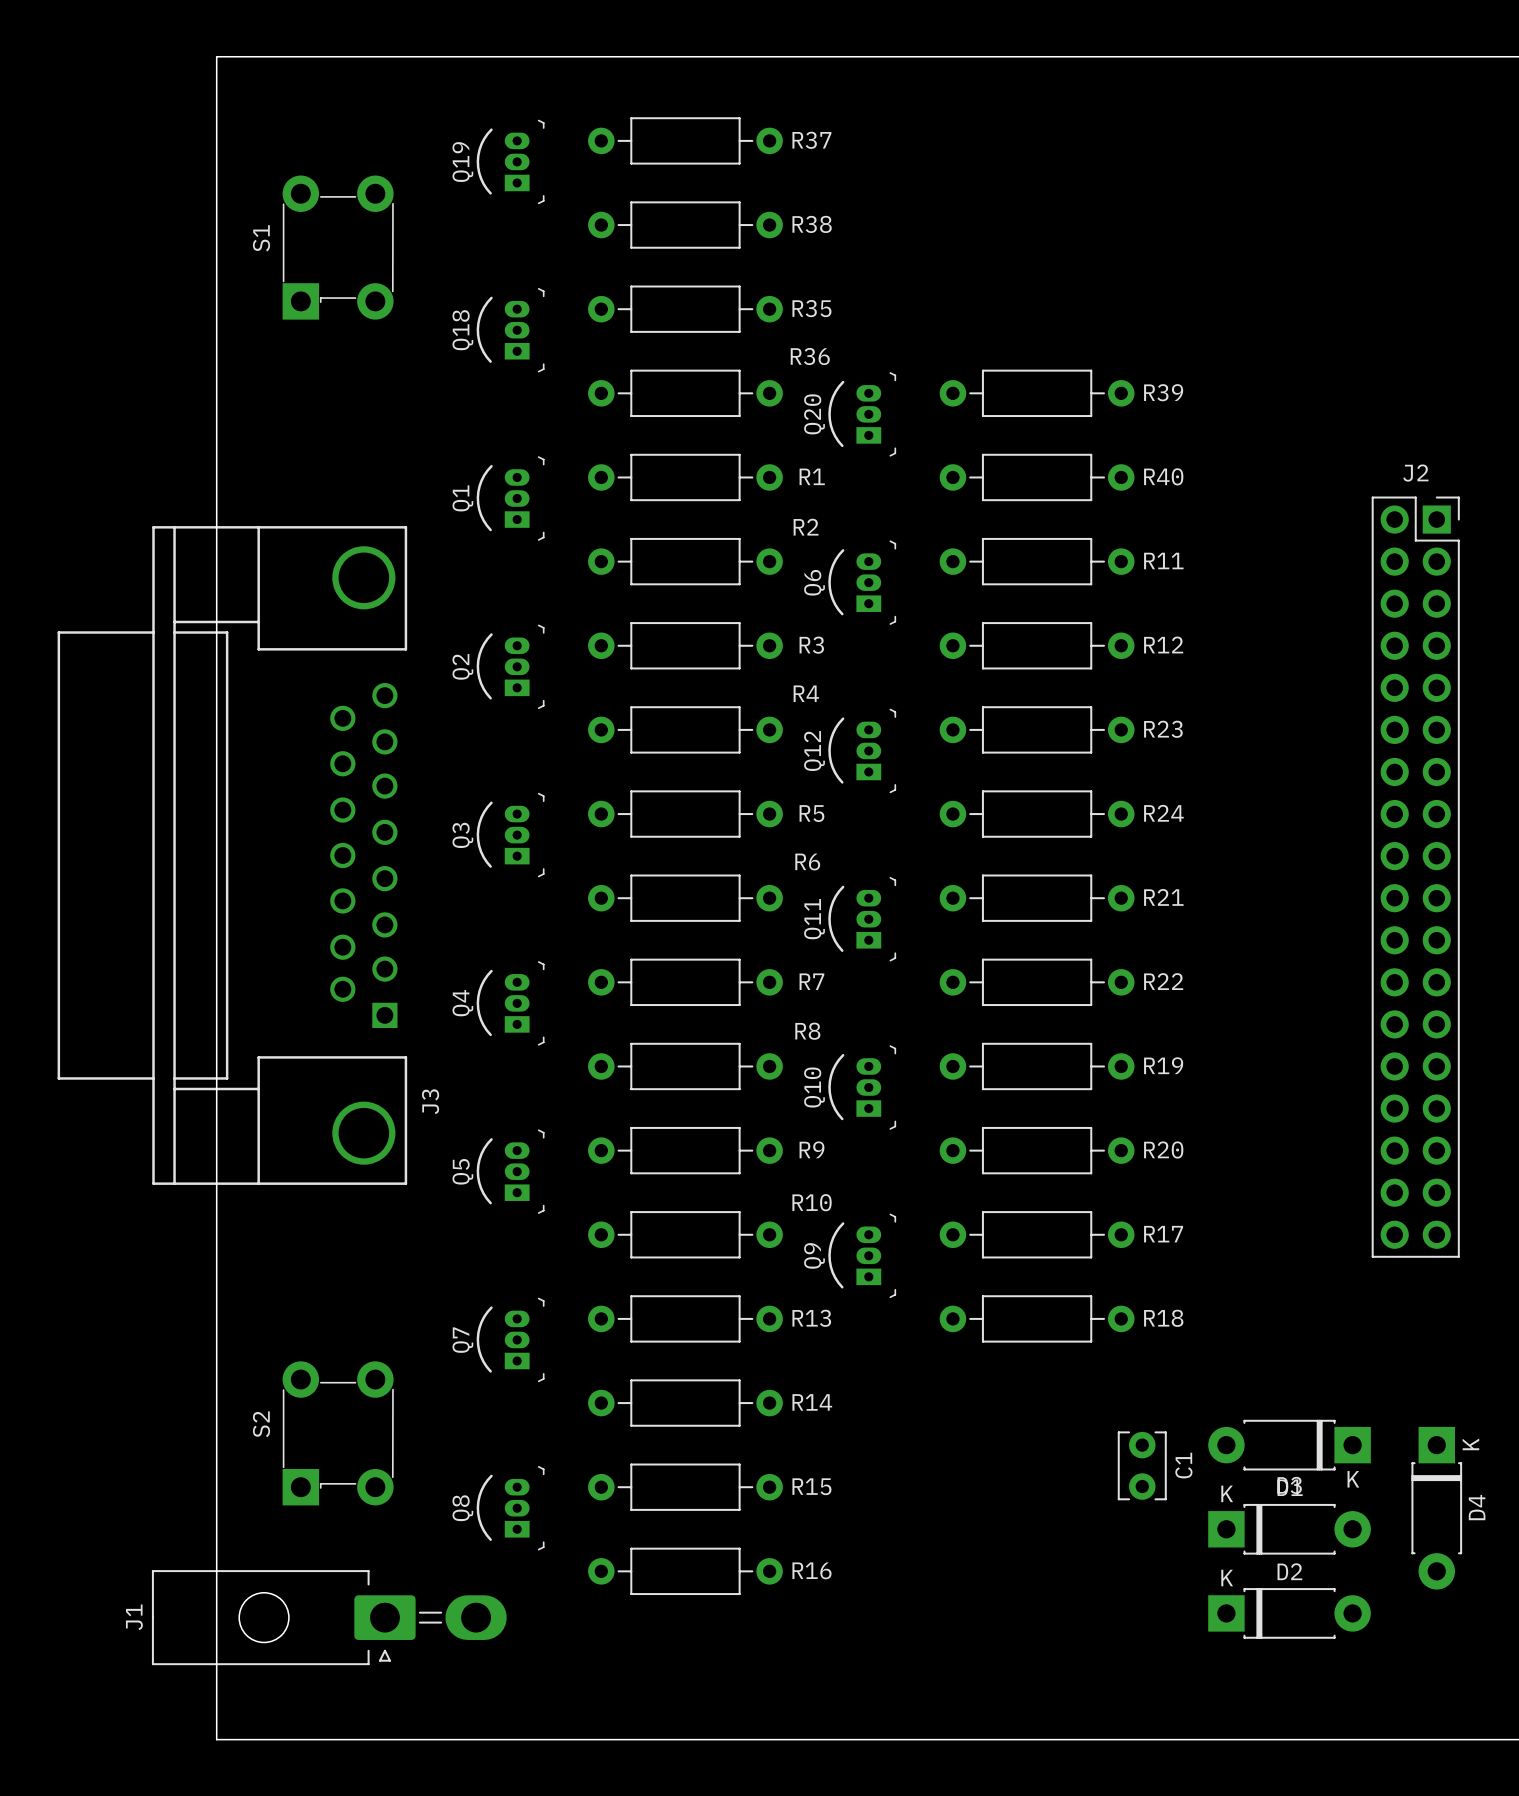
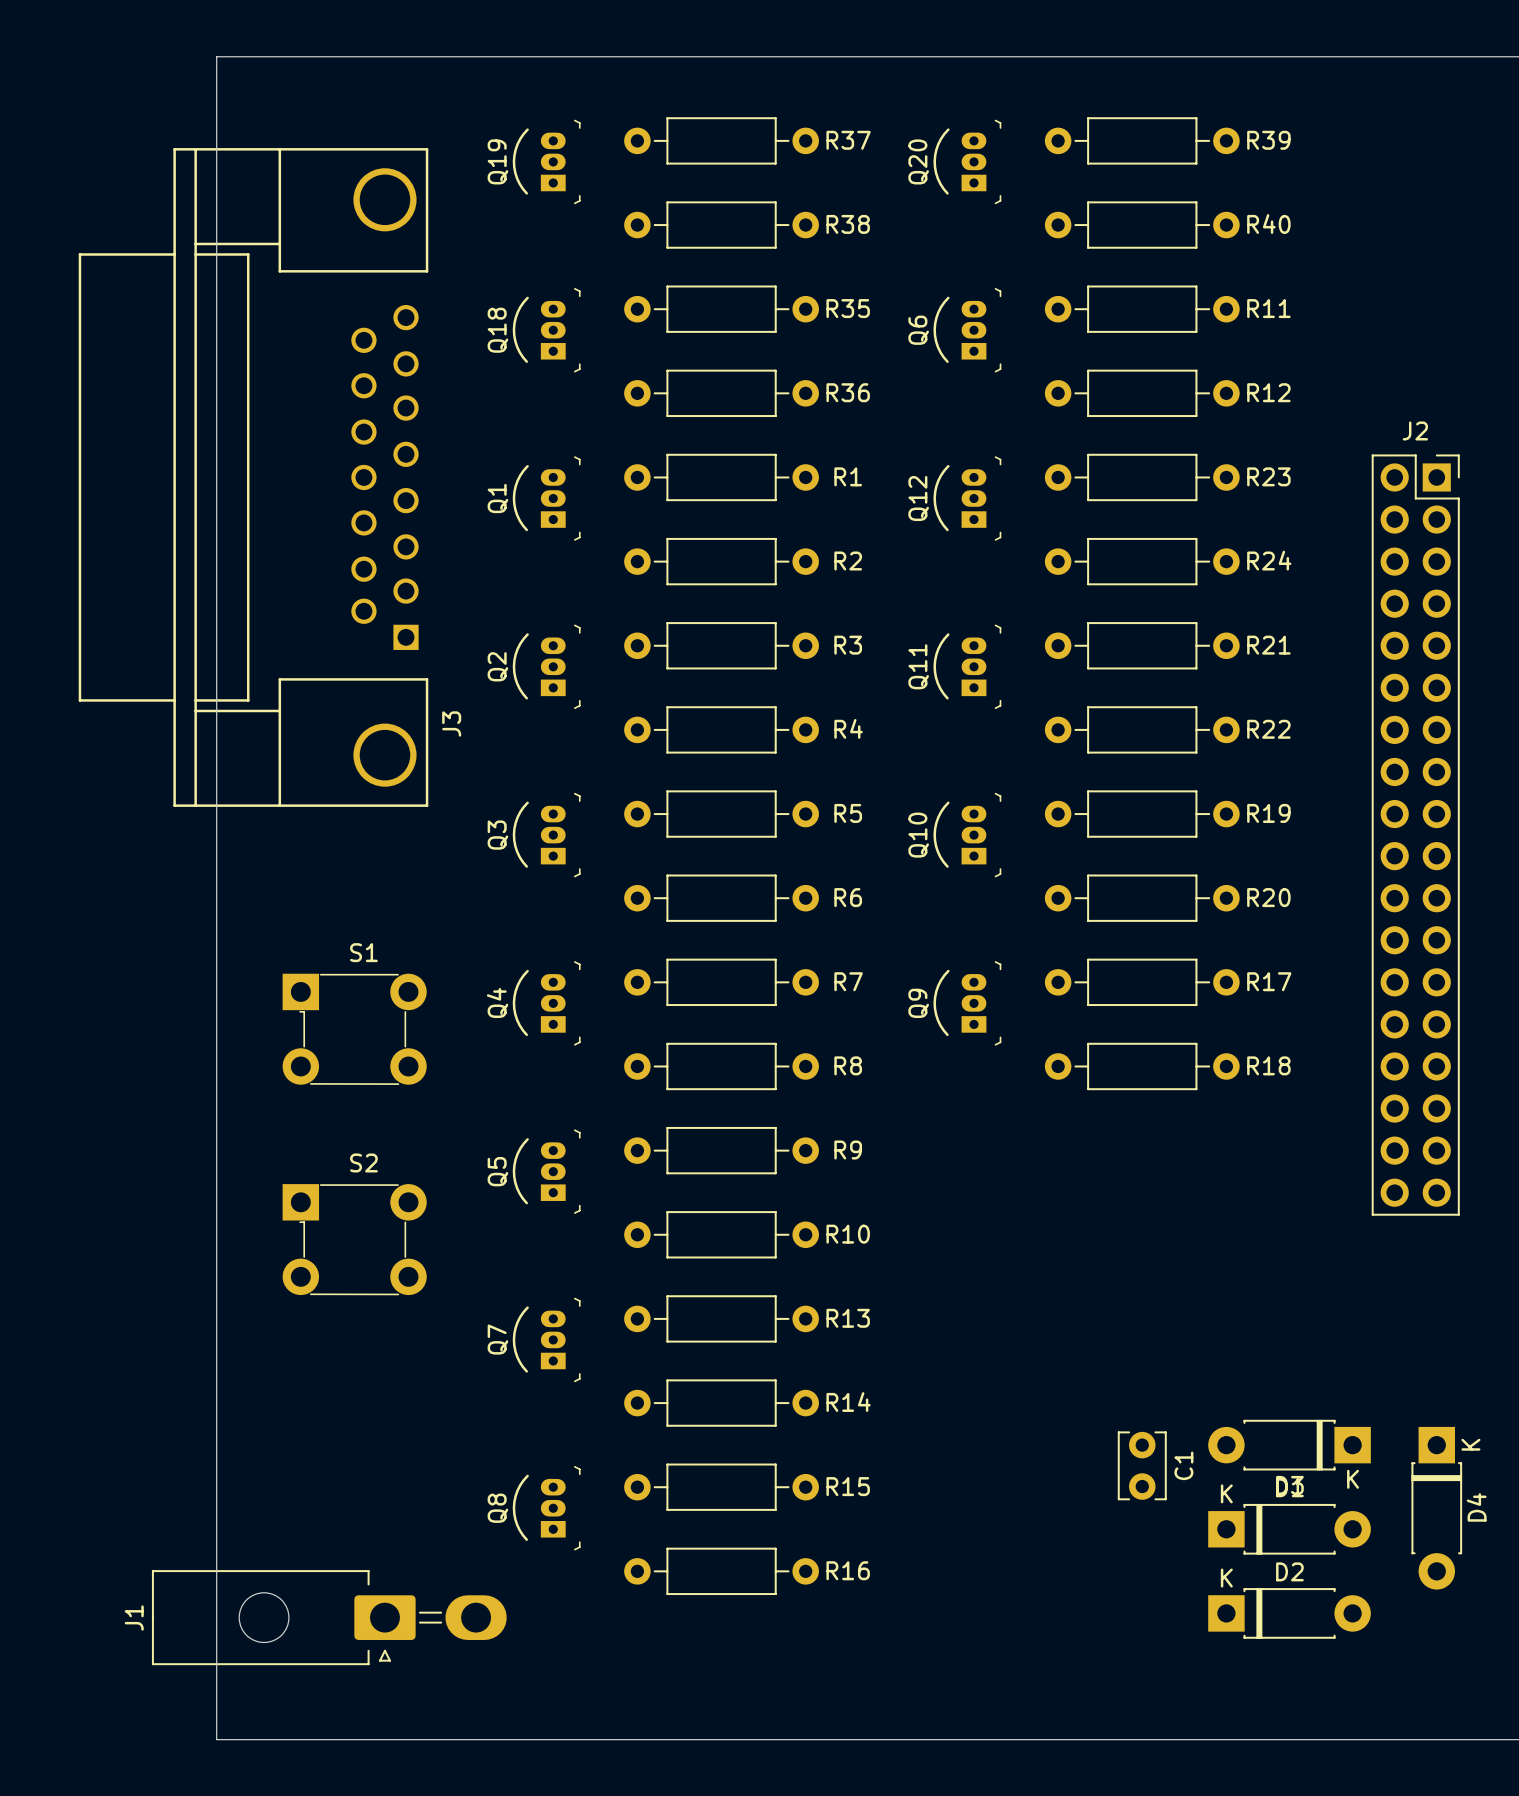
R37 position: (685, 140) -> (721, 140)
Q19 position: (510, 161) -> (546, 161)
R38 position: (685, 225) -> (721, 225)
S1 rotation: 0° (338, 247) -> 90° clockwise (354, 1029)
S1 position: (338, 247) -> (354, 1029)
R35 position: (685, 309) -> (721, 309)
Q18 position: (510, 330) -> (546, 330)
R36 name position: R36 (810, 356) -> R36 (848, 392)
R36 position: (685, 393) -> (721, 393)
R39 position: (1037, 393) -> (1142, 140)
Q20 position: (862, 414) -> (967, 161)
R1 position: (685, 477) -> (721, 477)
R40 position: (1037, 477) -> (1142, 225)
Q1 position: (510, 498) -> (546, 498)
R2 name position: R2 (806, 527) -> R2 (848, 561)
R2 position: (685, 561) -> (721, 561)
R11 position: (1037, 561) -> (1142, 309)
Q6 position: (862, 582) -> (967, 330)
R3 position: (685, 645) -> (721, 645)
R12 position: (1037, 645) -> (1142, 393)
Q2 position: (510, 666) -> (546, 666)
R4 name position: R4 (806, 693) -> R4 (848, 728)
R4 position: (685, 729) -> (721, 729)
R23 position: (1037, 729) -> (1142, 477)
Q12 position: (862, 750) -> (967, 498)
R5 position: (685, 814) -> (721, 814)
R24 position: (1037, 814) -> (1142, 561)
Q3 position: (510, 835) -> (546, 835)
J3 position: (232, 855) -> (253, 477)
R6 name position: R6 (807, 862) -> R6 (848, 897)
J2 position: (1415, 877) -> (1415, 835)
R6 position: (685, 898) -> (721, 898)
R21 position: (1037, 898) -> (1142, 645)
Q11 position: (862, 919) -> (967, 666)
R7 position: (685, 982) -> (721, 982)
R22 position: (1037, 982) -> (1142, 729)
Q4 position: (510, 1003) -> (546, 1003)
R8 name position: R8 (807, 1031) -> R8 (848, 1065)
R8 position: (685, 1066) -> (721, 1066)
R19 position: (1037, 1066) -> (1142, 814)
Q10 position: (862, 1087) -> (967, 835)
R9 position: (685, 1150) -> (721, 1150)
R20 position: (1037, 1150) -> (1142, 898)
Q5 position: (510, 1171) -> (546, 1171)
R10 name position: R10 (812, 1202) -> R10 (848, 1234)
R10 position: (685, 1234) -> (721, 1234)
R17 position: (1037, 1234) -> (1142, 982)
Q9 position: (862, 1255) -> (967, 1003)
R13 position: (685, 1318) -> (721, 1318)
R18 position: (1037, 1318) -> (1142, 1066)
Q7 position: (510, 1339) -> (546, 1339)
R14 position: (685, 1403) -> (721, 1403)
S2 rotation: 0° (338, 1433) -> 90° clockwise (354, 1239)
S2 position: (338, 1433) -> (354, 1239)
R15 position: (685, 1487) -> (721, 1487)
Q8 position: (510, 1508) -> (546, 1508)
R16 position: (685, 1571) -> (721, 1571)

